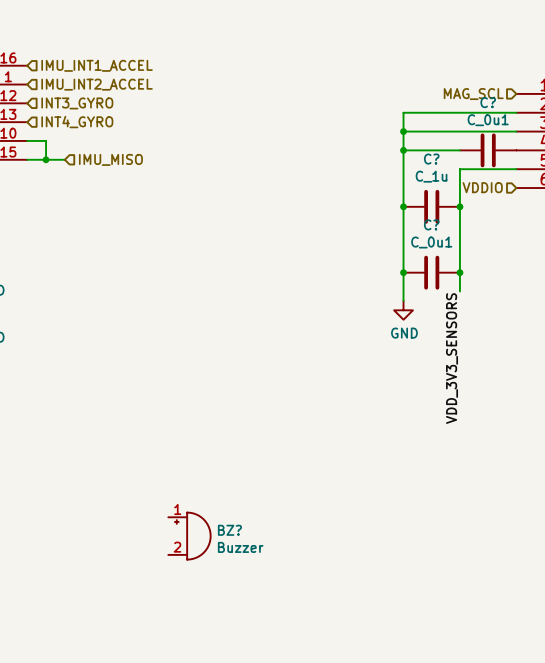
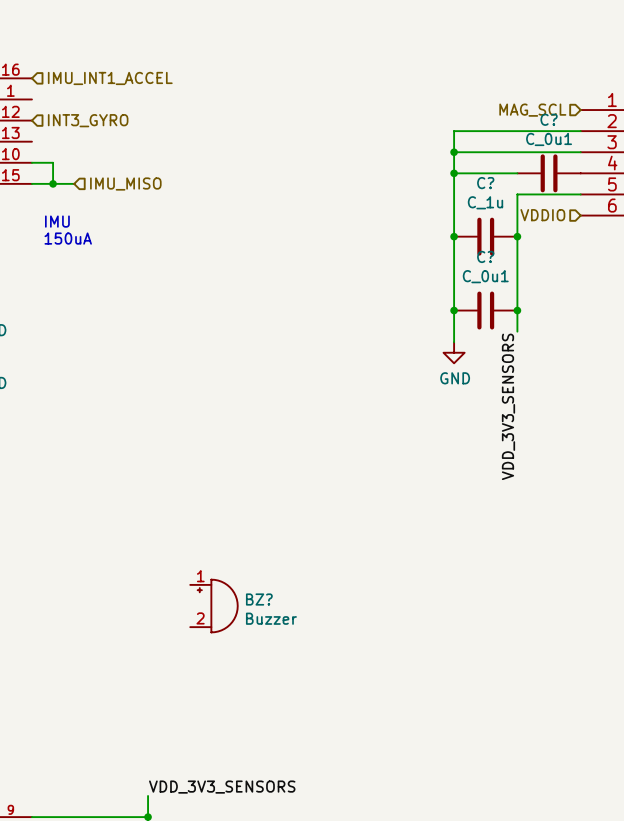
hierarchical label: IMU_INT2_ACCEL (97, 84) -> none
hierarchical label: INT4_GYRO (77, 122) -> none
text: none -> IMU (57, 221)
text: none -> 150uA (68, 238)

